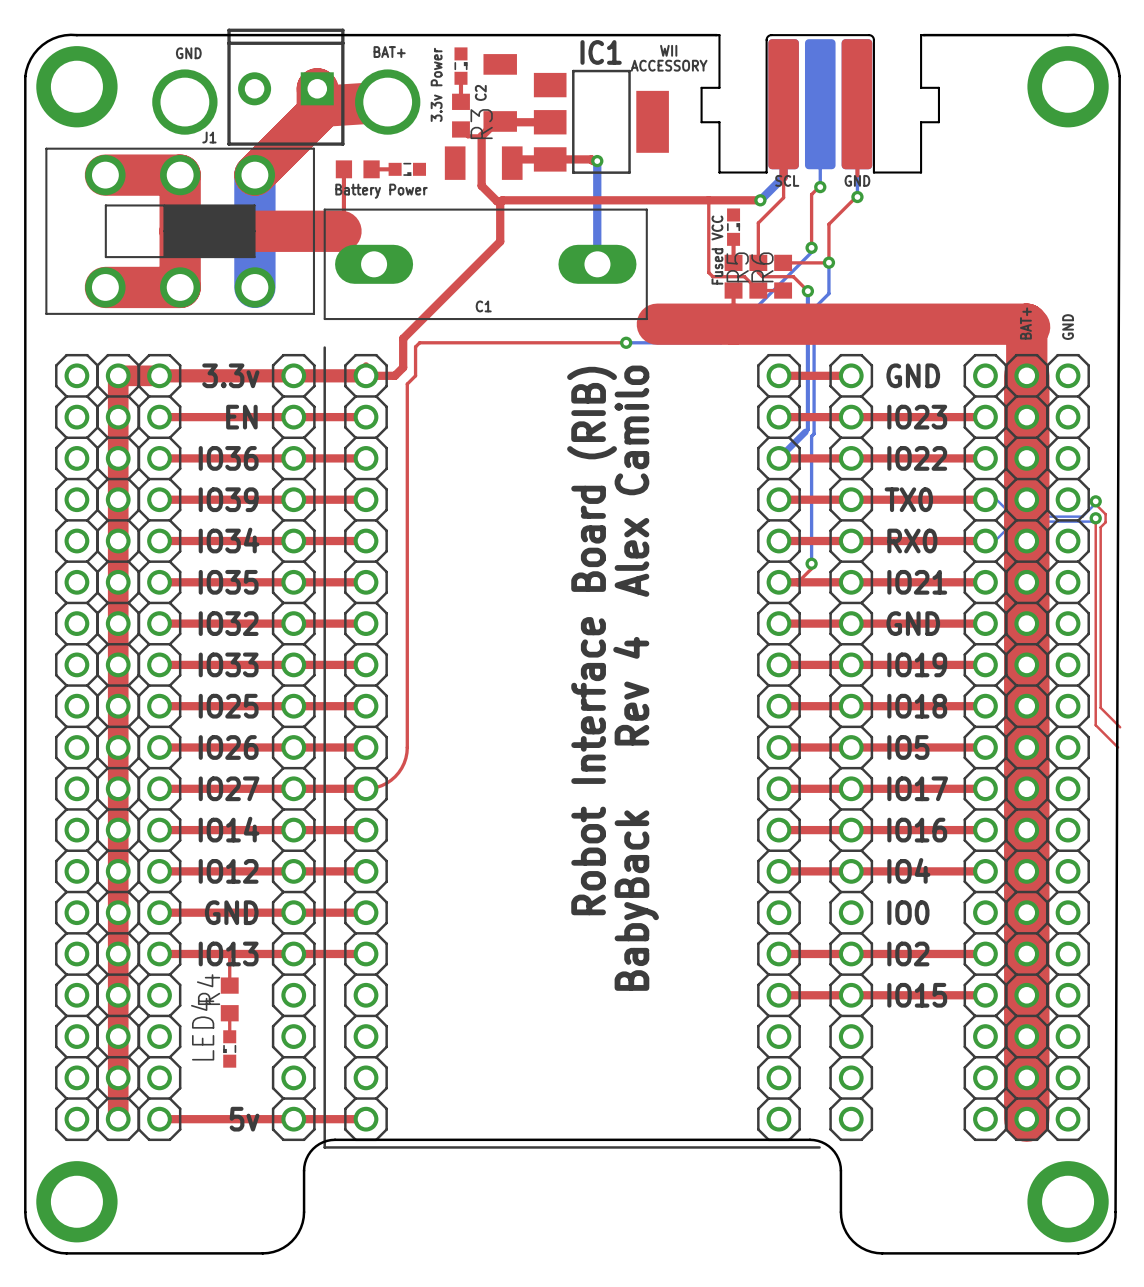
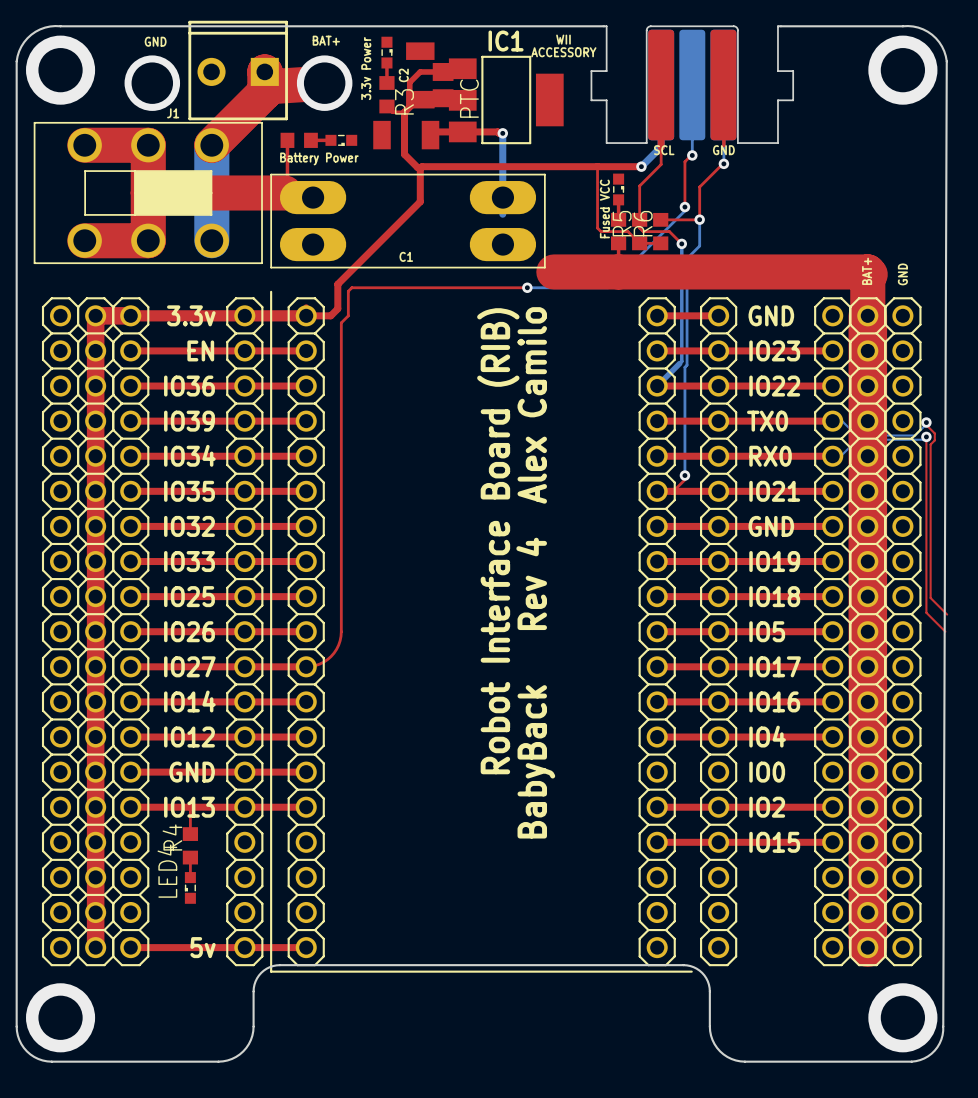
top track: none -> (443, 71) (420, 71) (409, 82) (409, 99)
PTC: none -> (443, 85)
part footprint: [323, 208, 648, 321] -> [270, 173, 546, 269]

